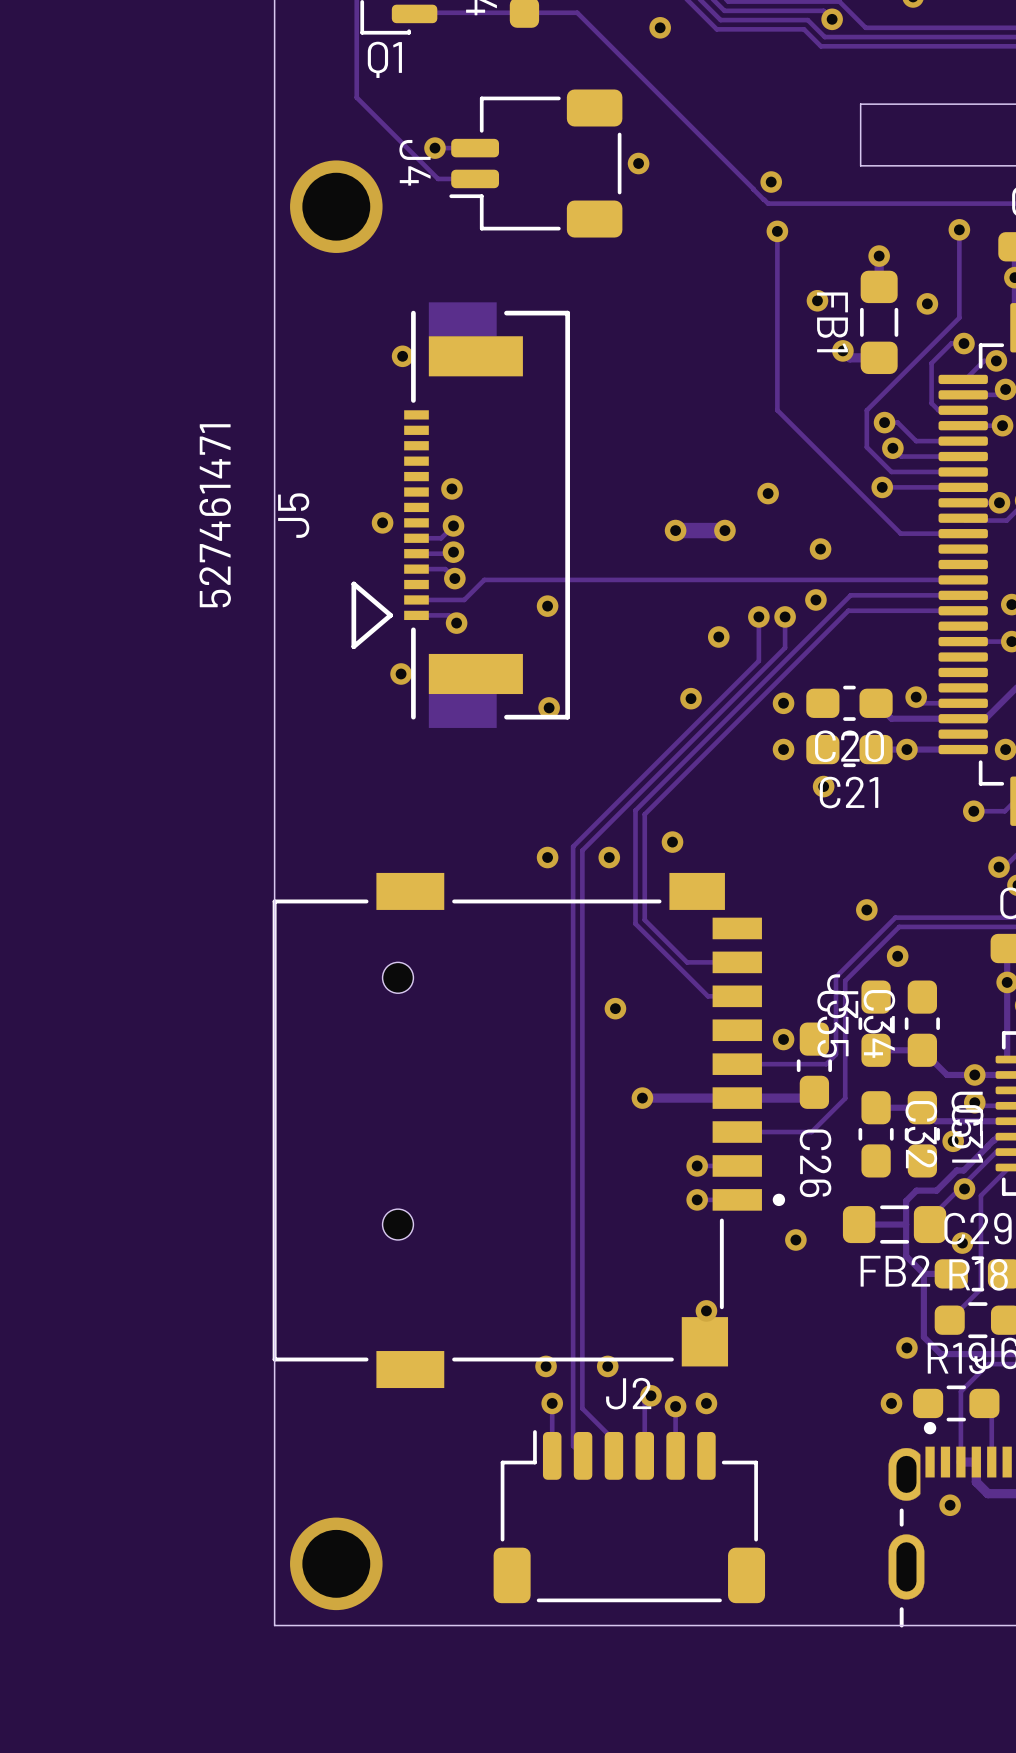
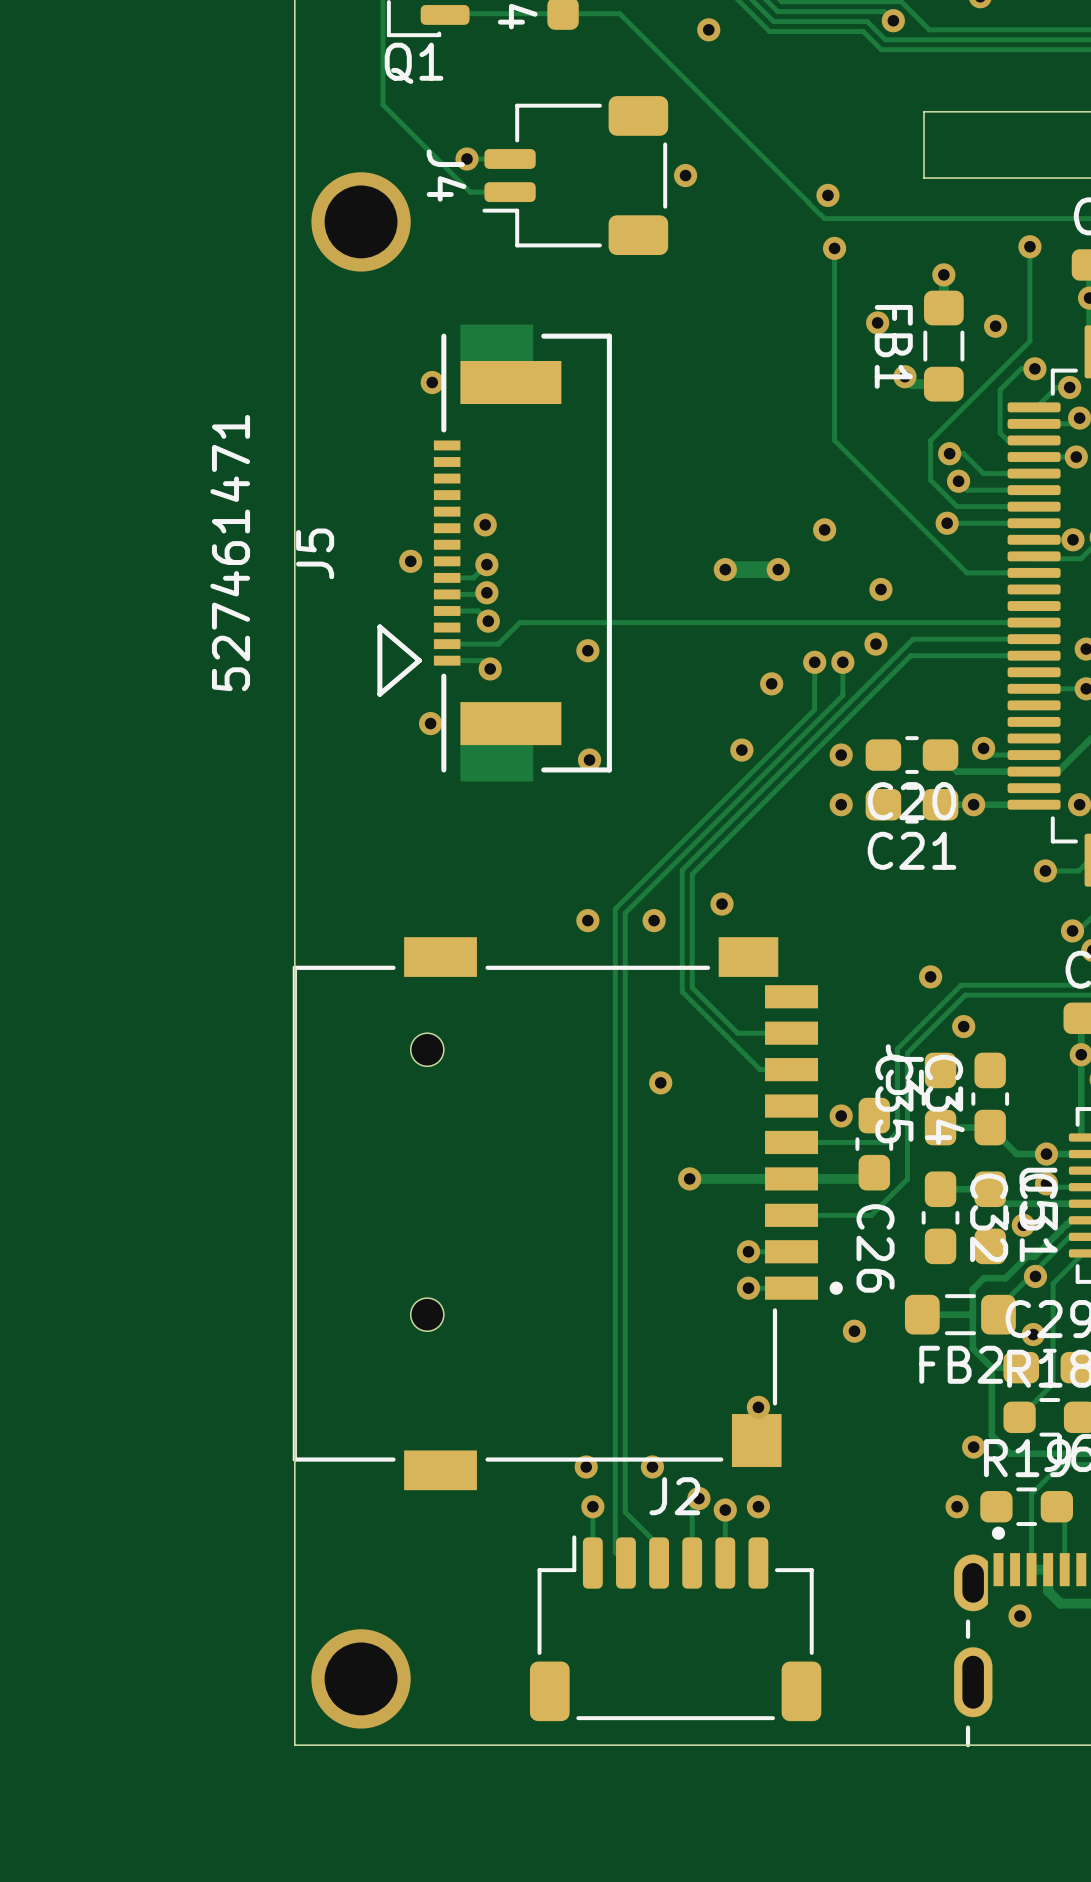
via: (823, 786) -> none

